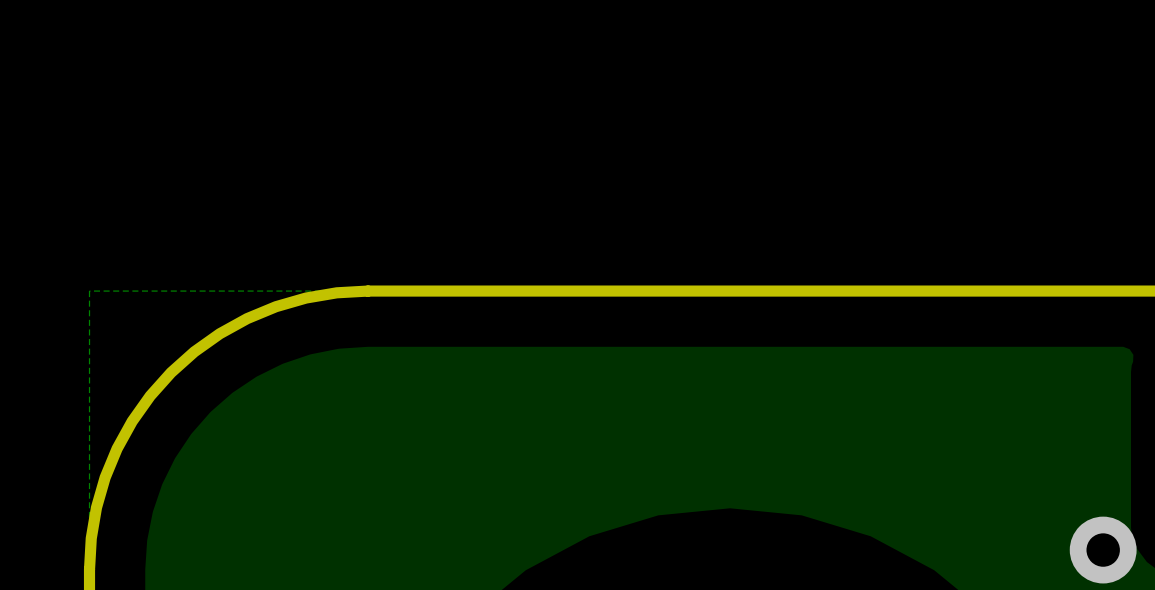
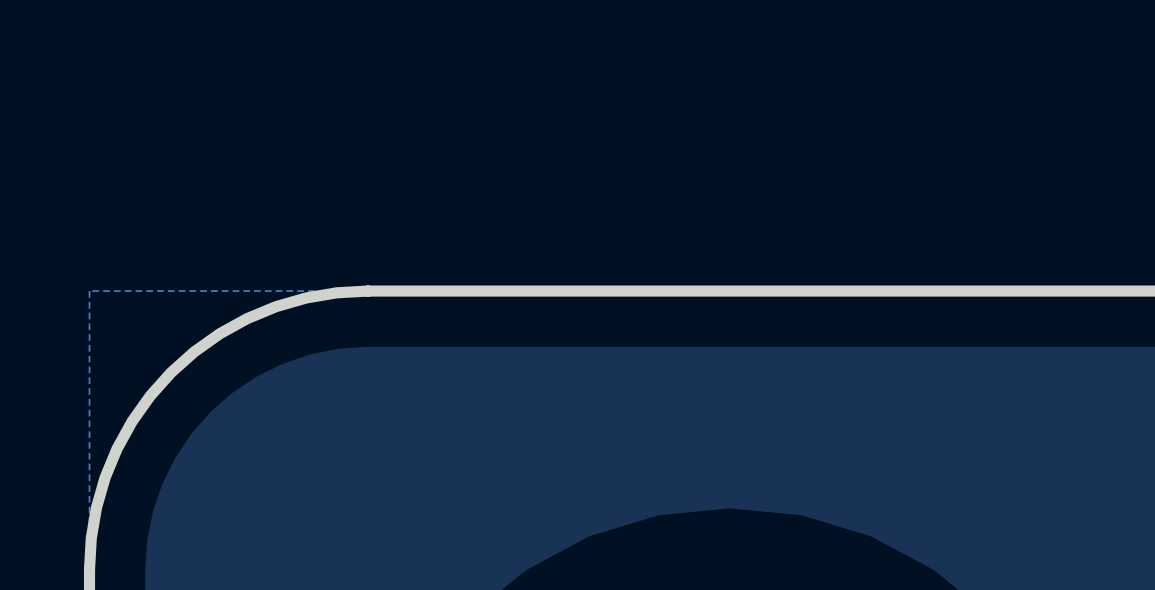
via: (1103, 550) -> none

